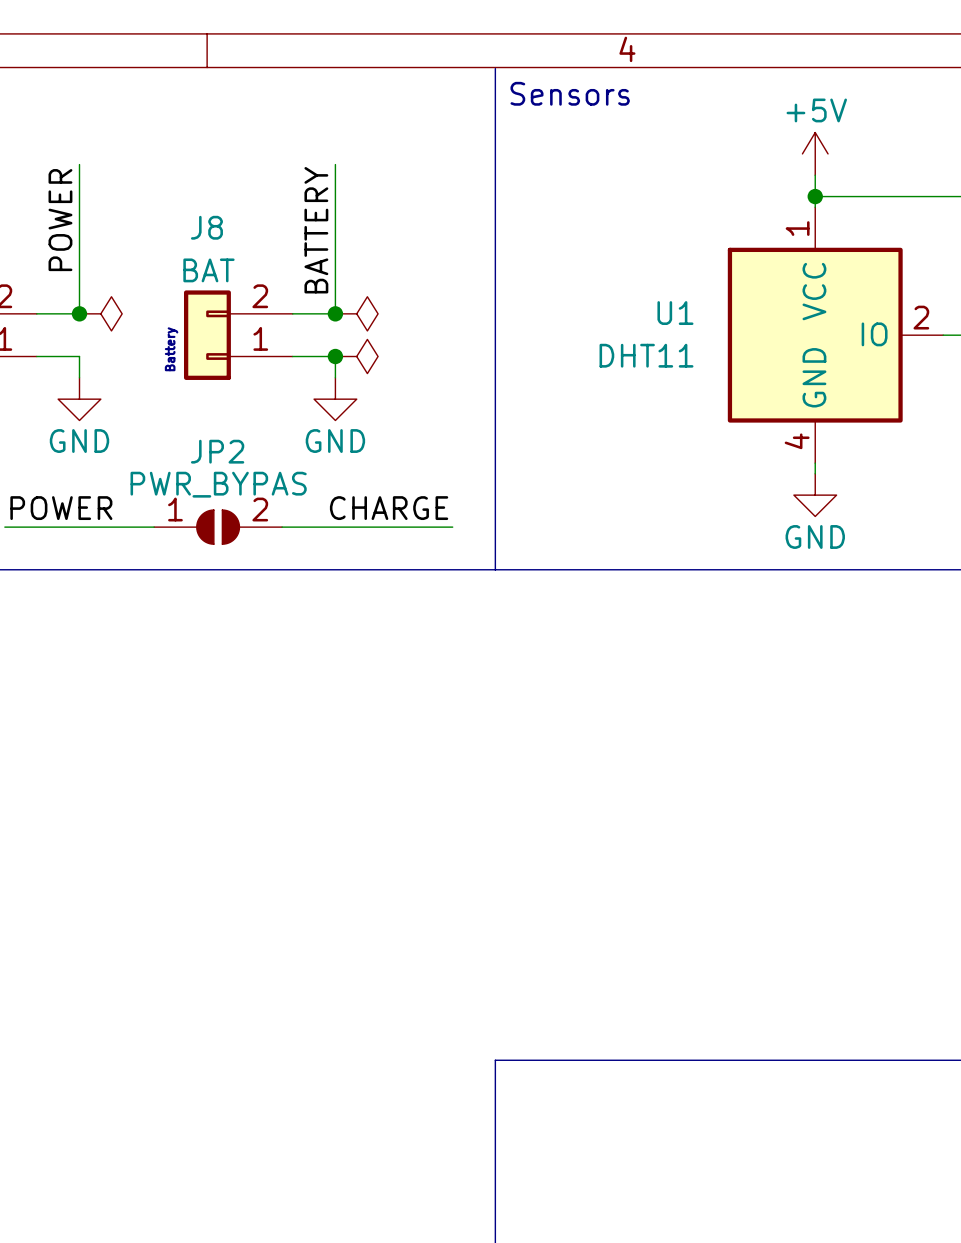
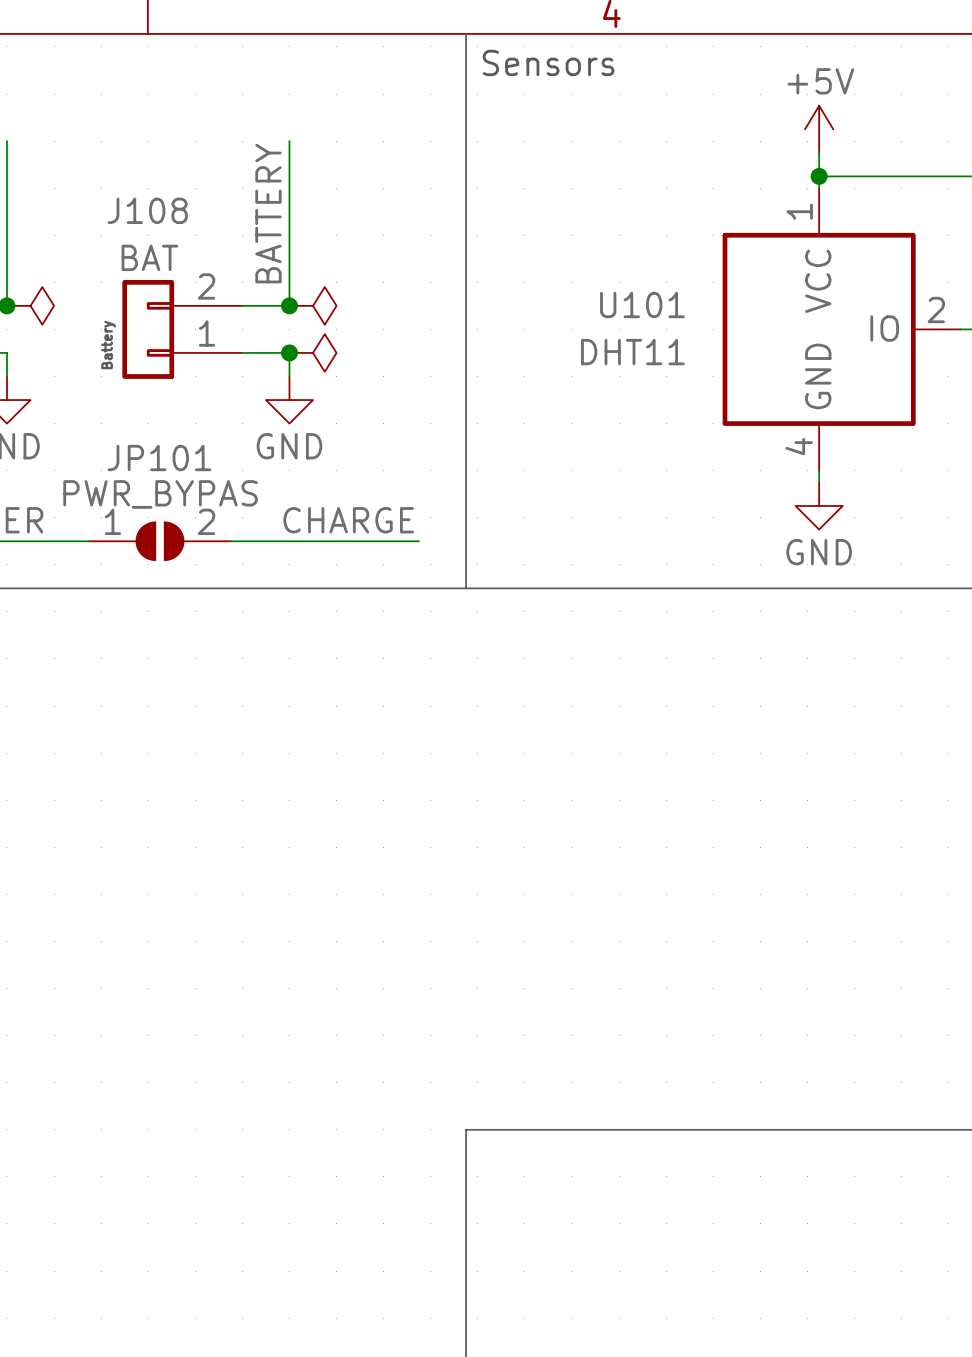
J8 name: J8 (206, 227) -> J108 (147, 210)
U1 name: U1 (675, 313) -> U101 (642, 304)
JP2 name: JP2 (217, 451) -> JP101 (159, 458)

